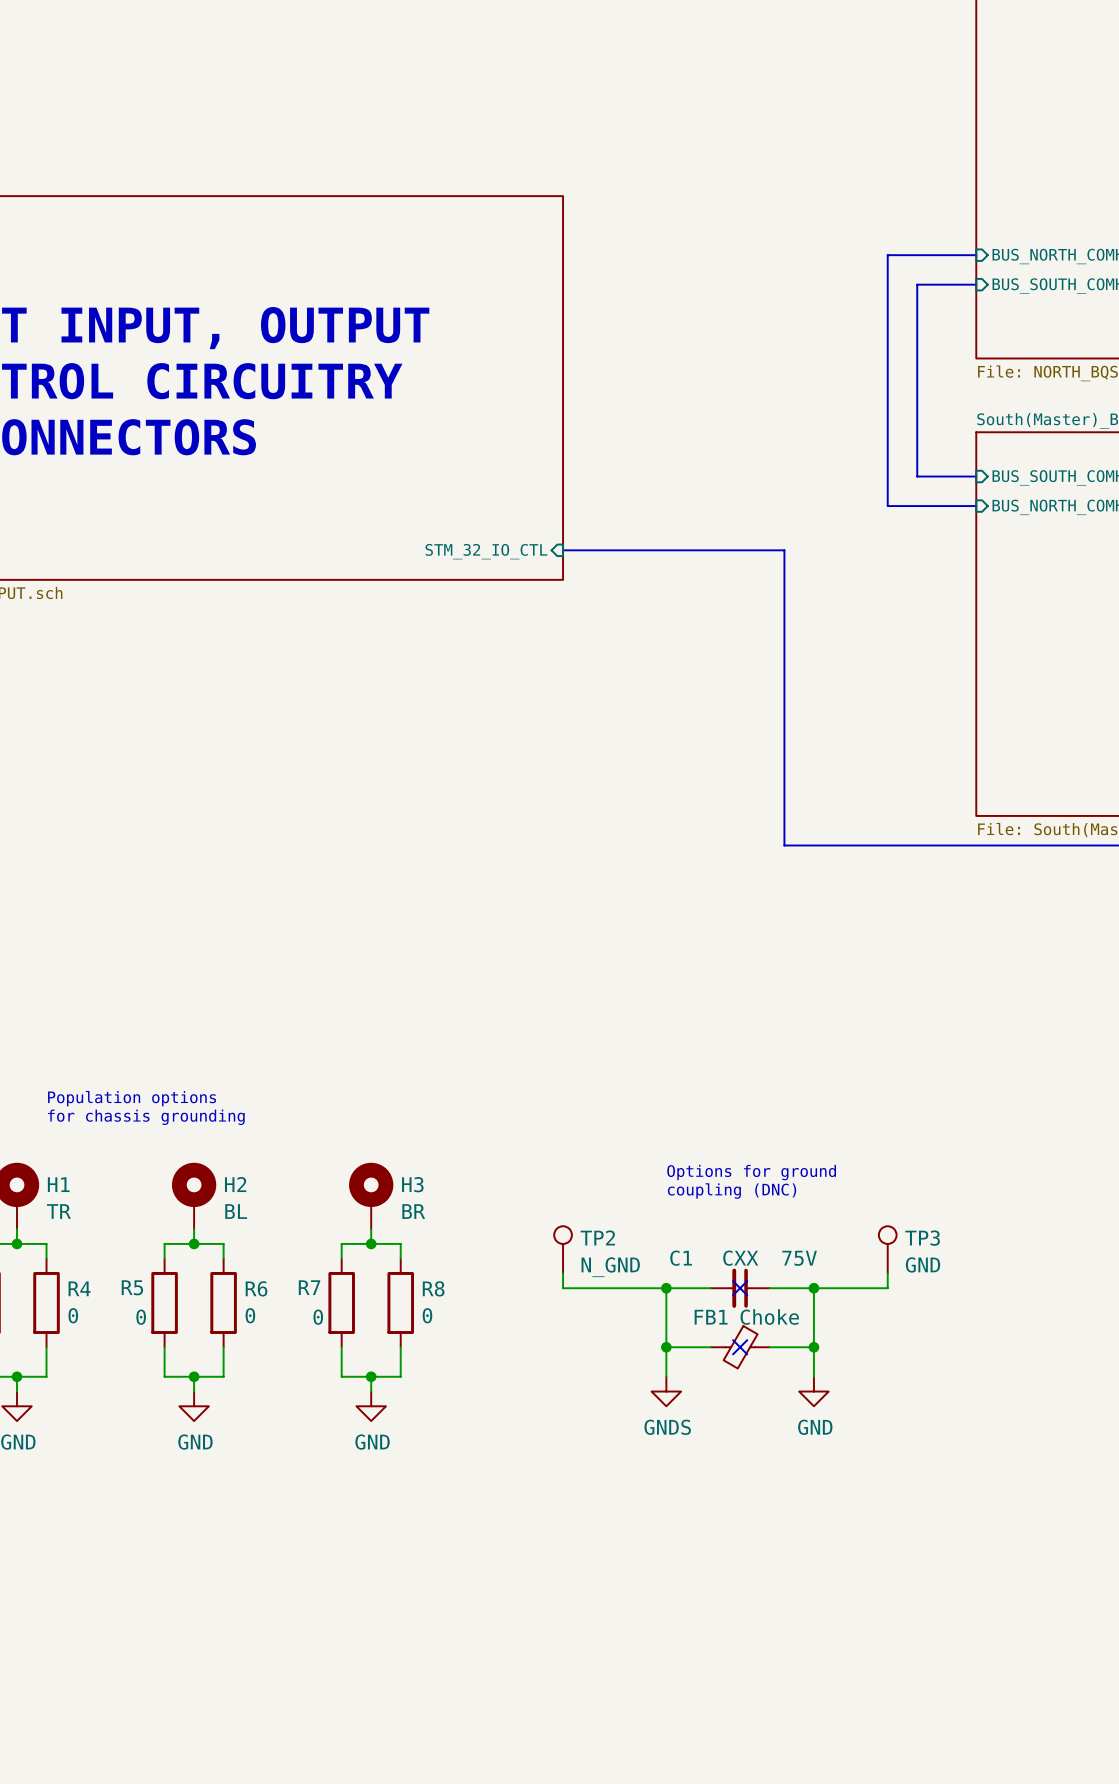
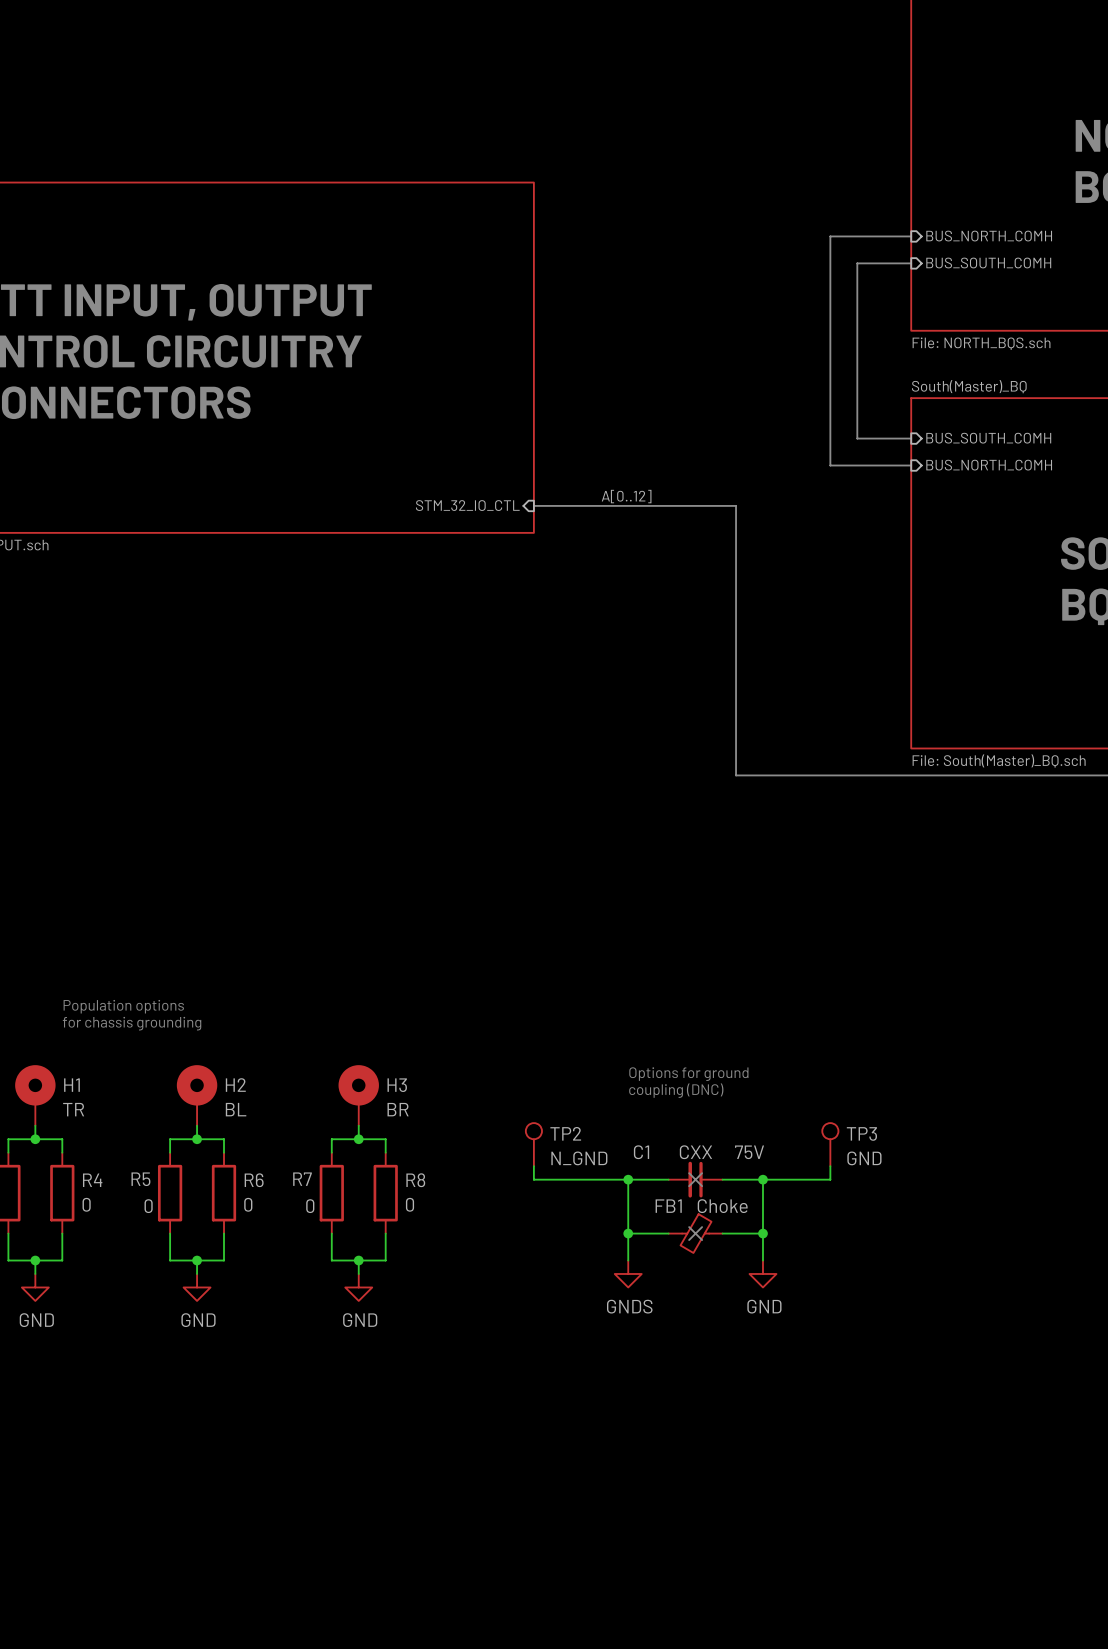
label: none -> A[0..12] (626, 496)

